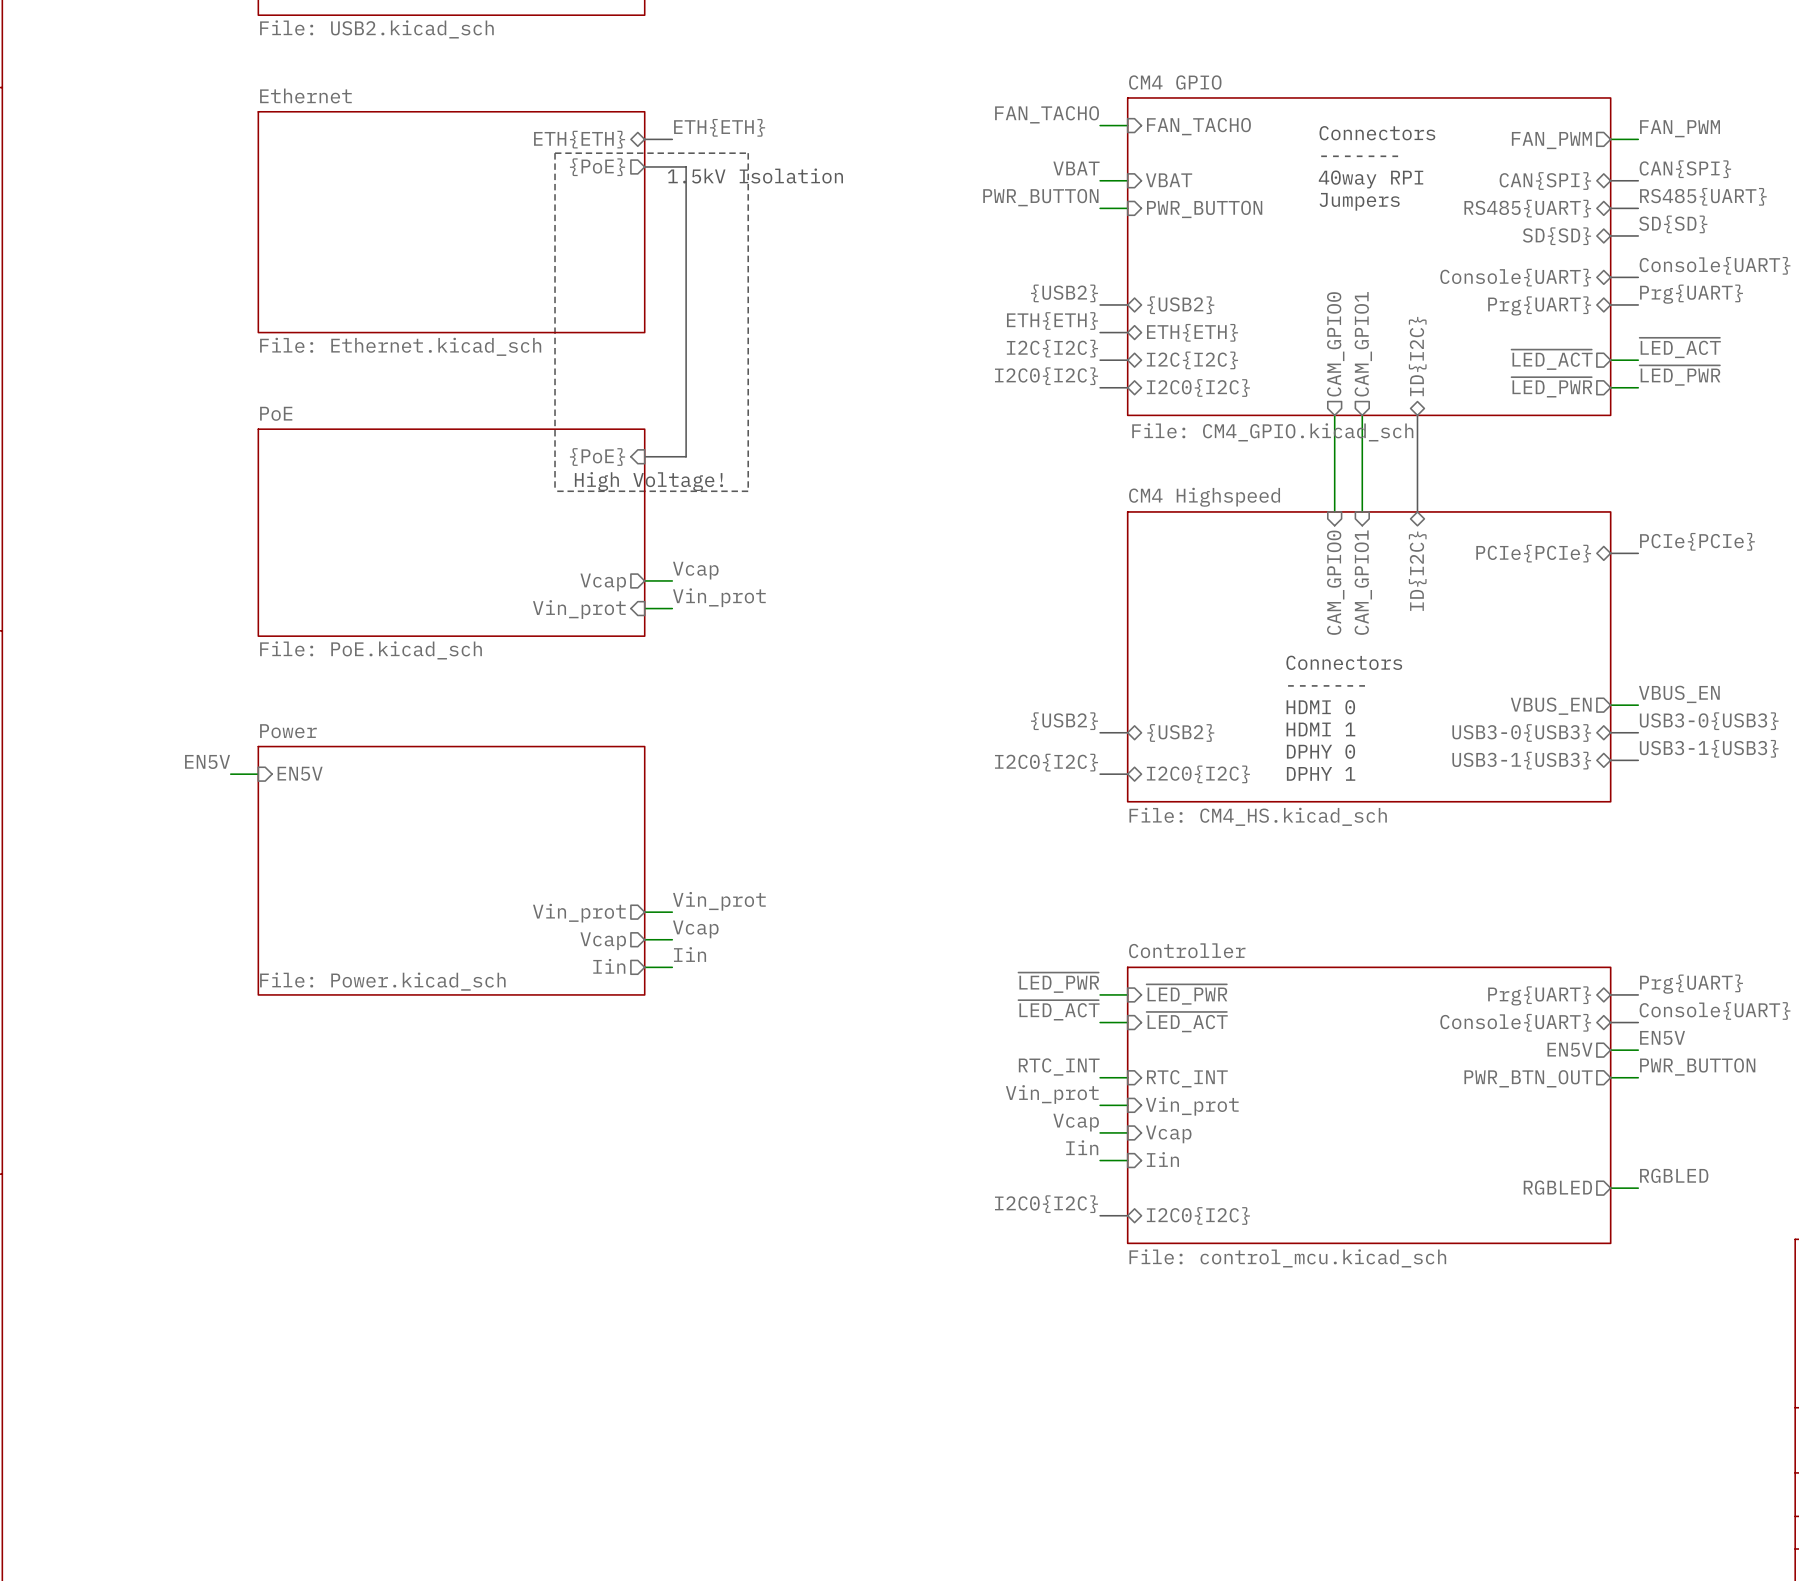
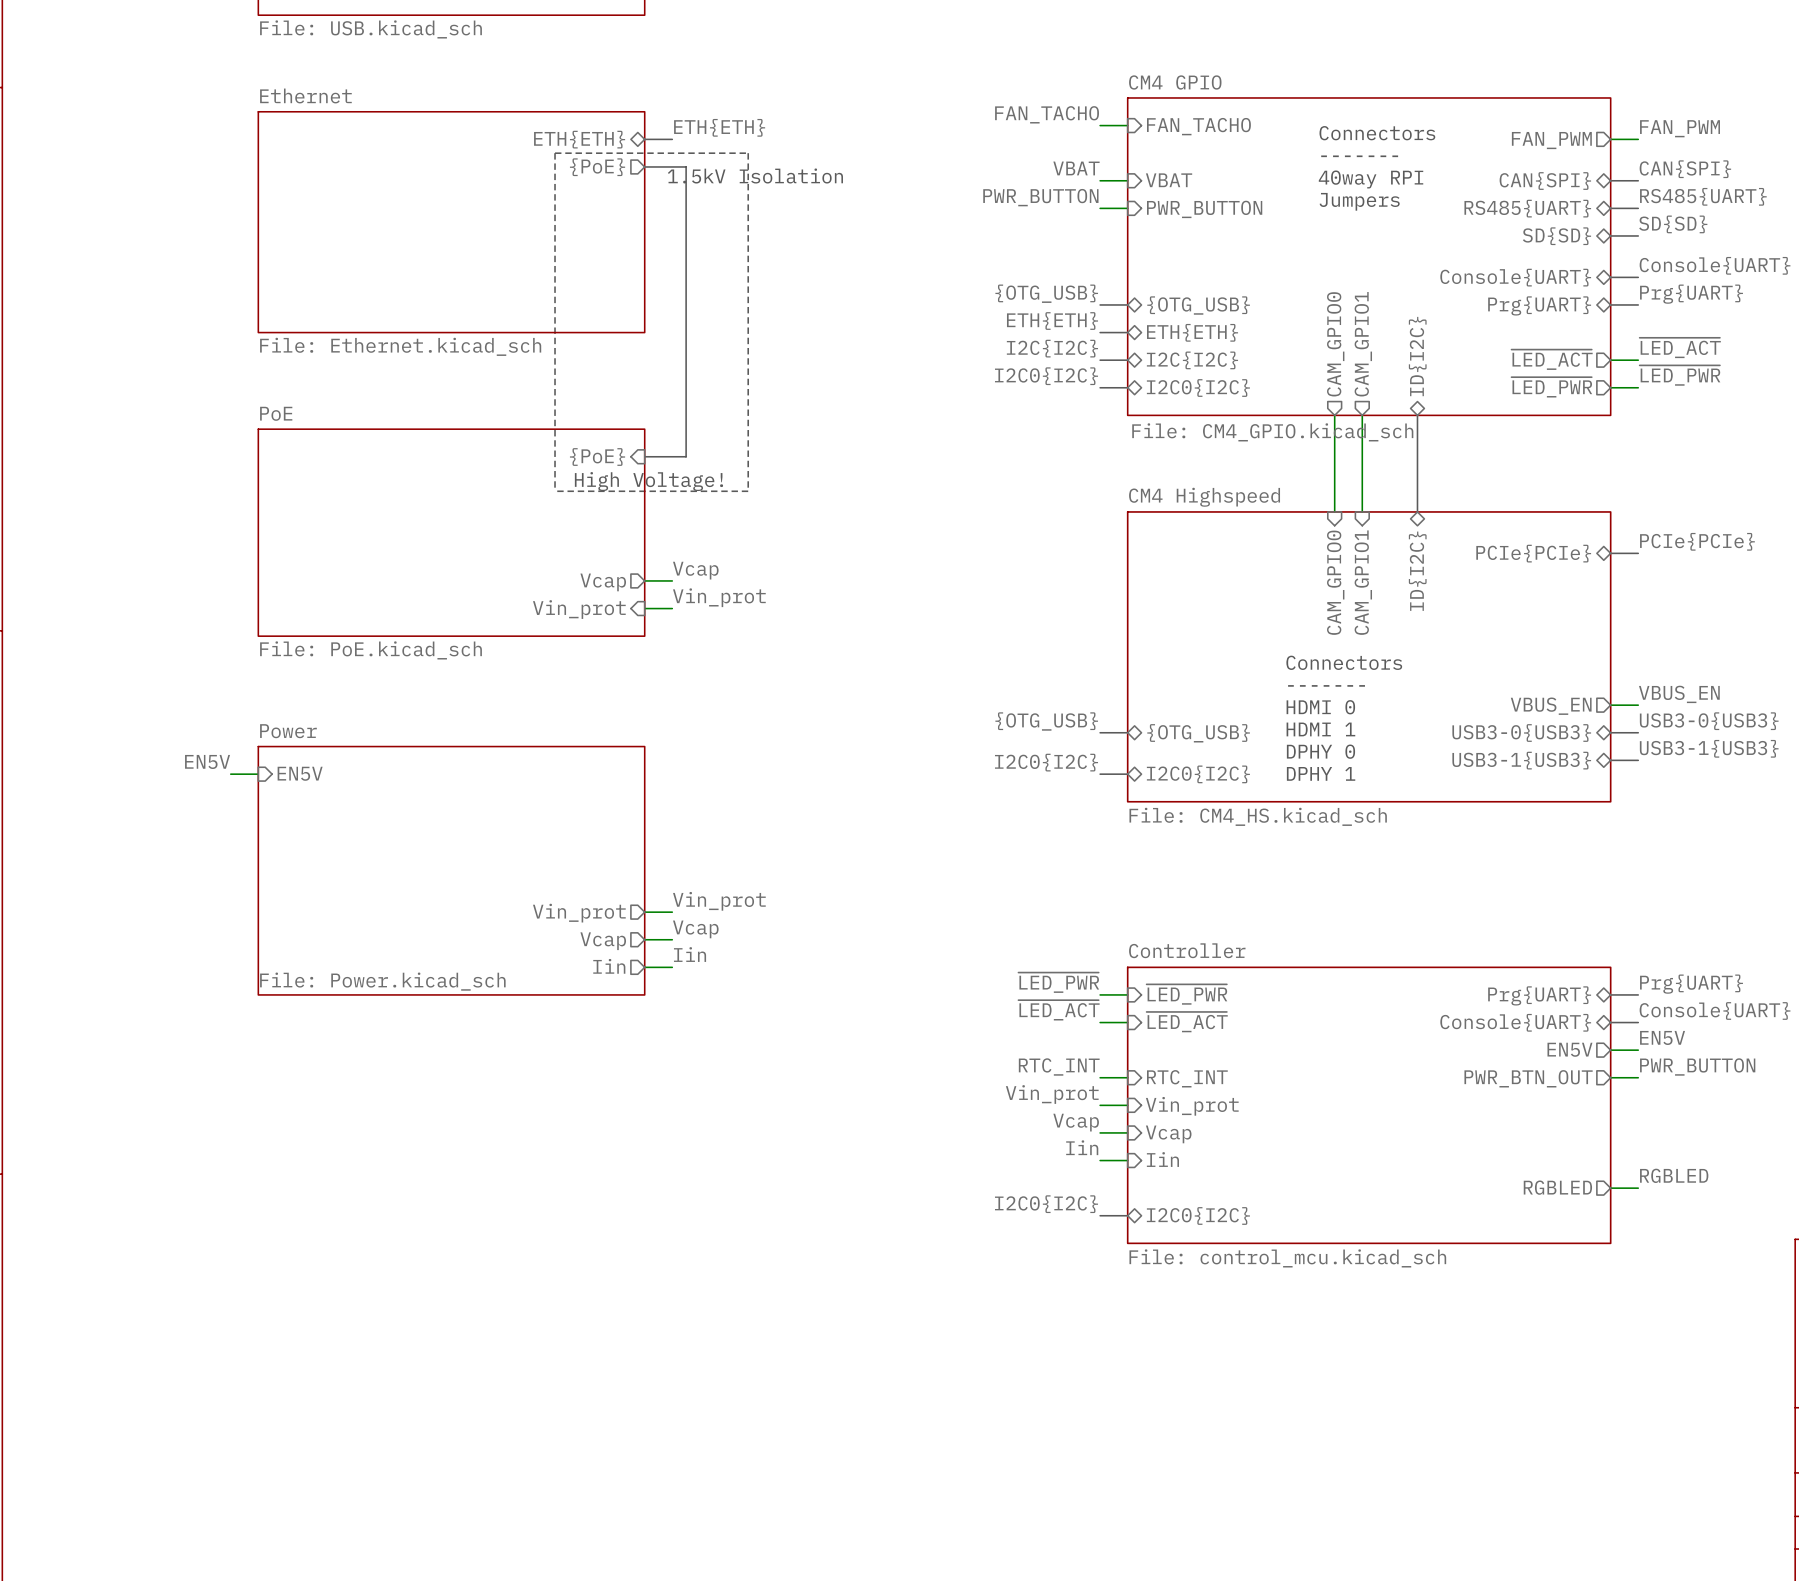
sheet value: File: USB2.kicad_sch (376, 29) -> File: USB.kicad_sch (371, 29)
label: {USB2} (1064, 293) -> {OTG_USB} (1046, 293)
sheet pin: {USB2} (1180, 305) -> {OTG_USB} (1198, 305)
label: {USB2} (1064, 721) -> {OTG_USB} (1046, 721)
sheet pin: {USB2} (1180, 733) -> {OTG_USB} (1198, 733)

